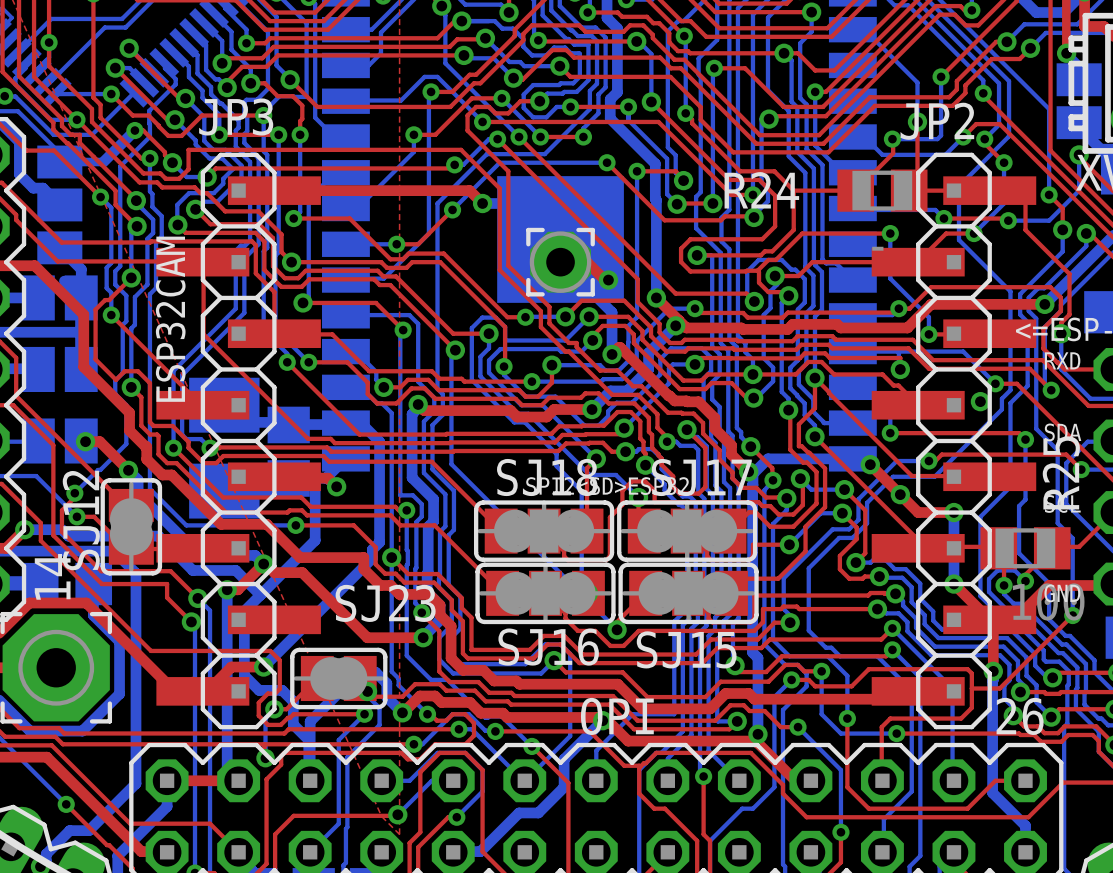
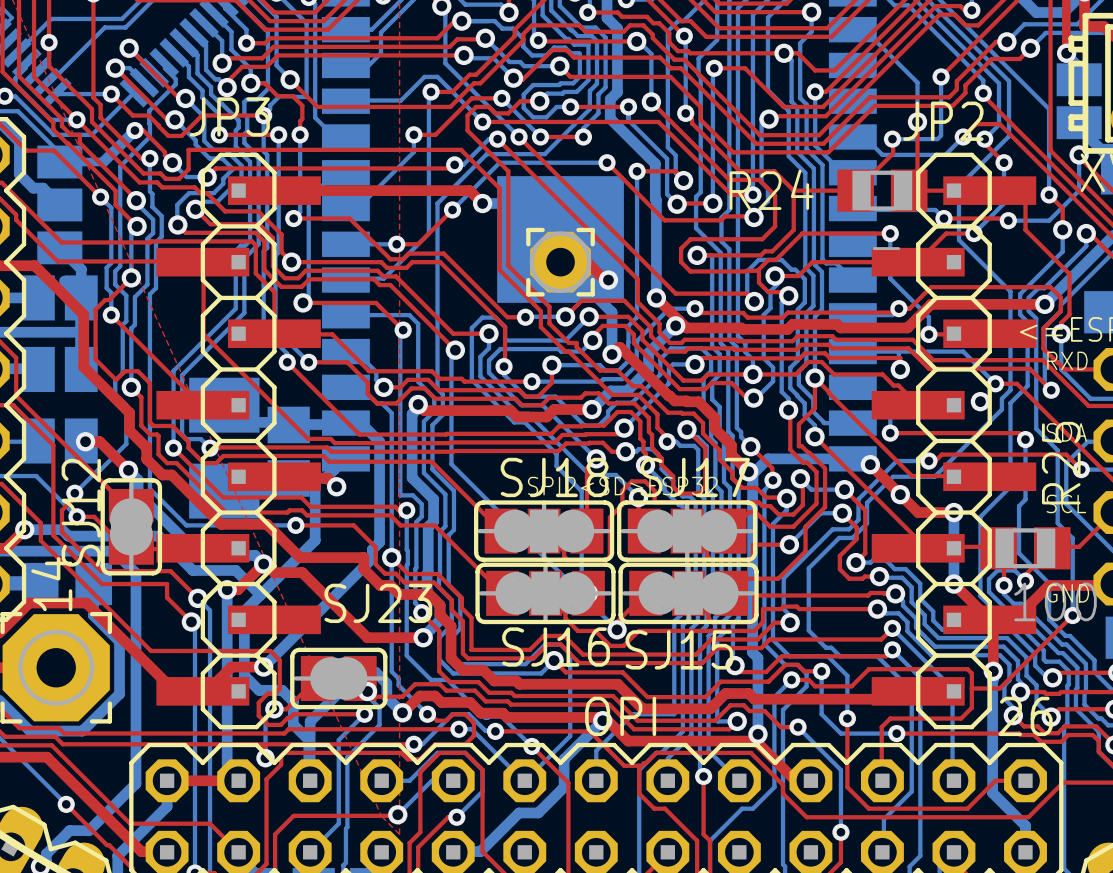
text: ESP32CAM (170, 319) -> none

